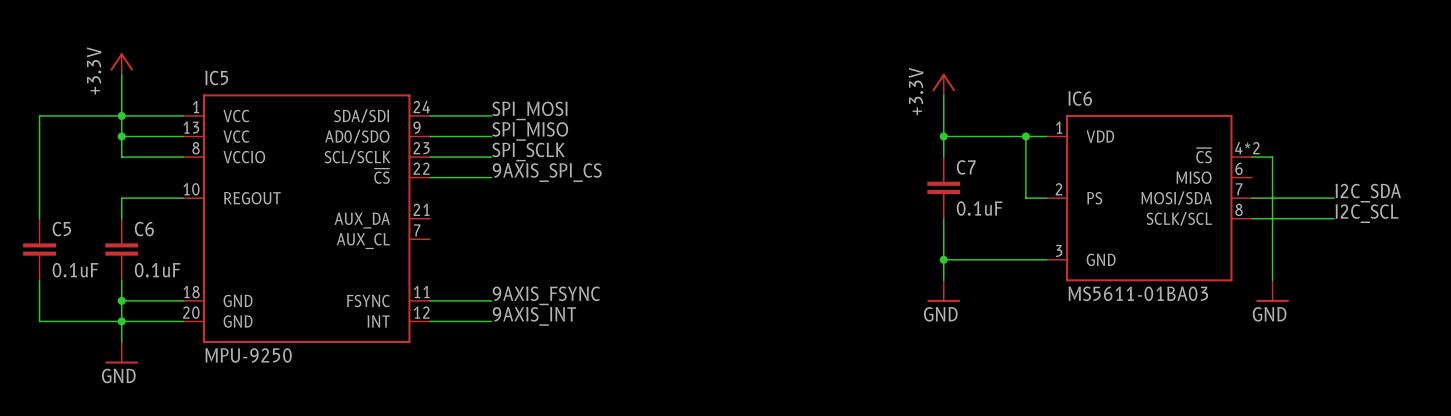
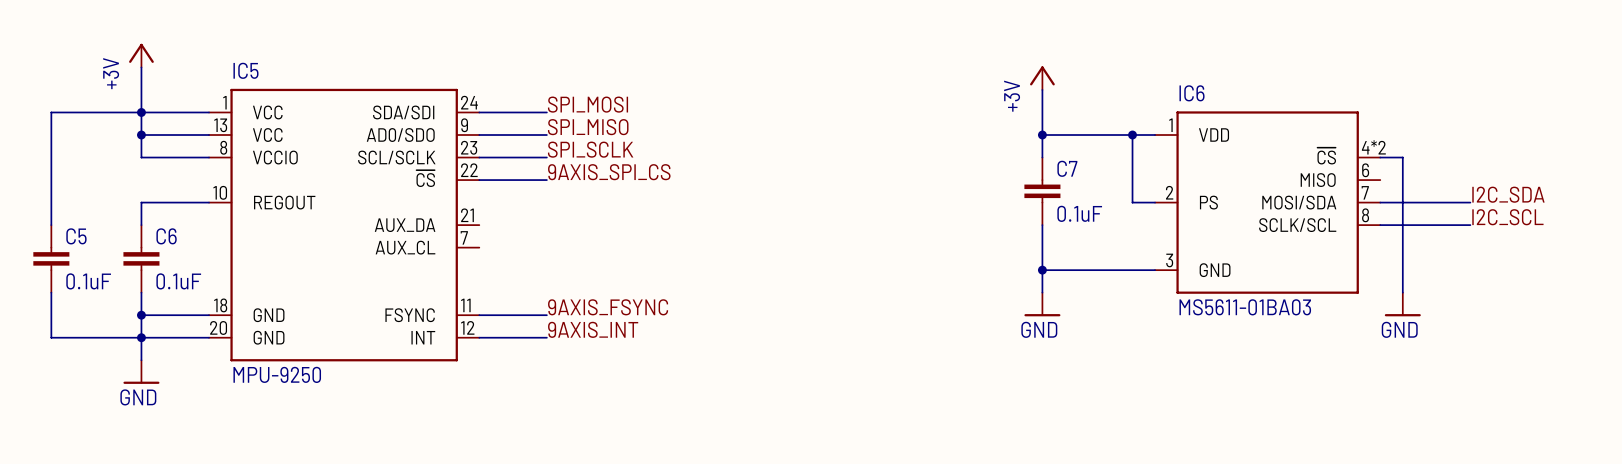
power symbol: +3.3V (121, 64) -> +3V (141, 55)
power symbol: +3.3V (943, 84) -> +3V (1042, 78)

